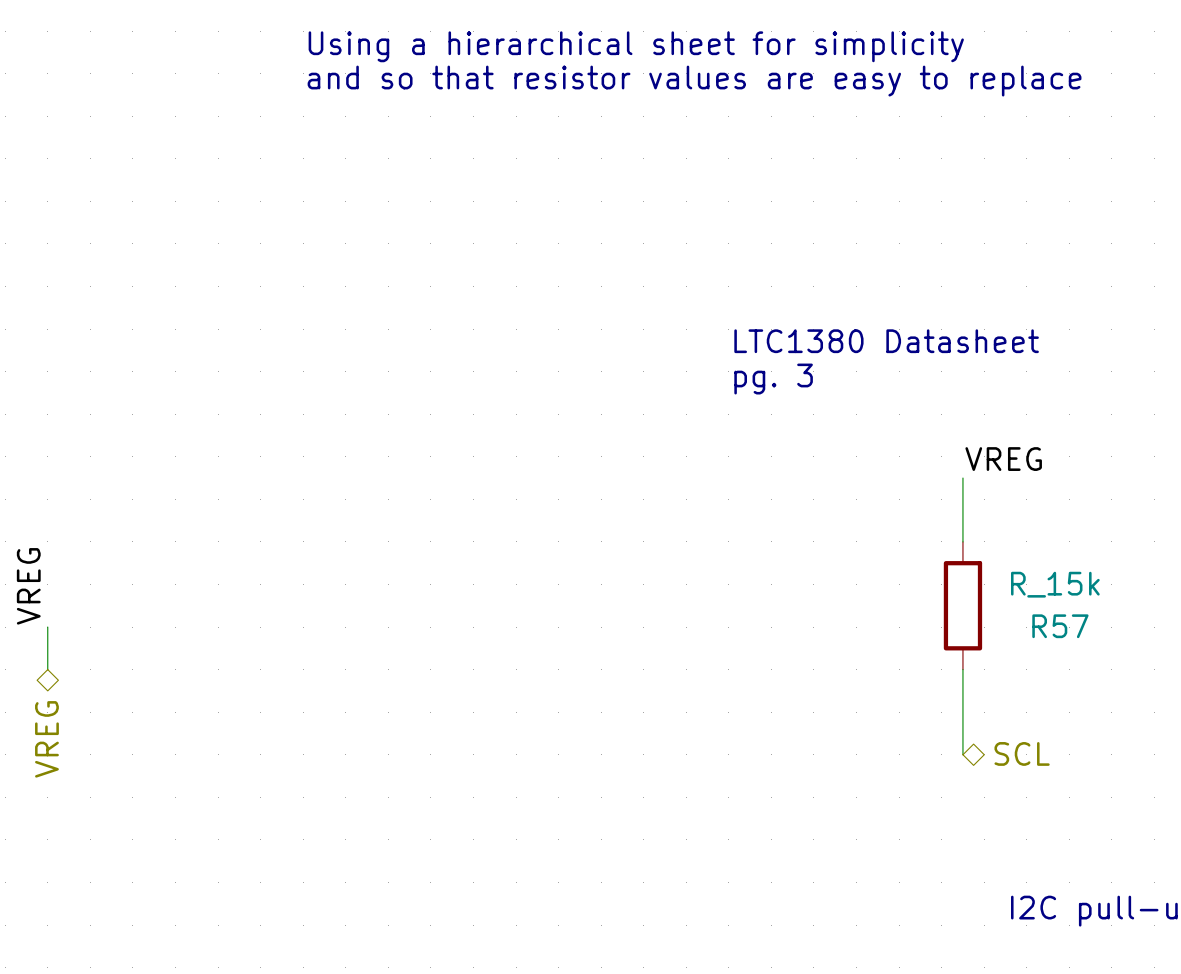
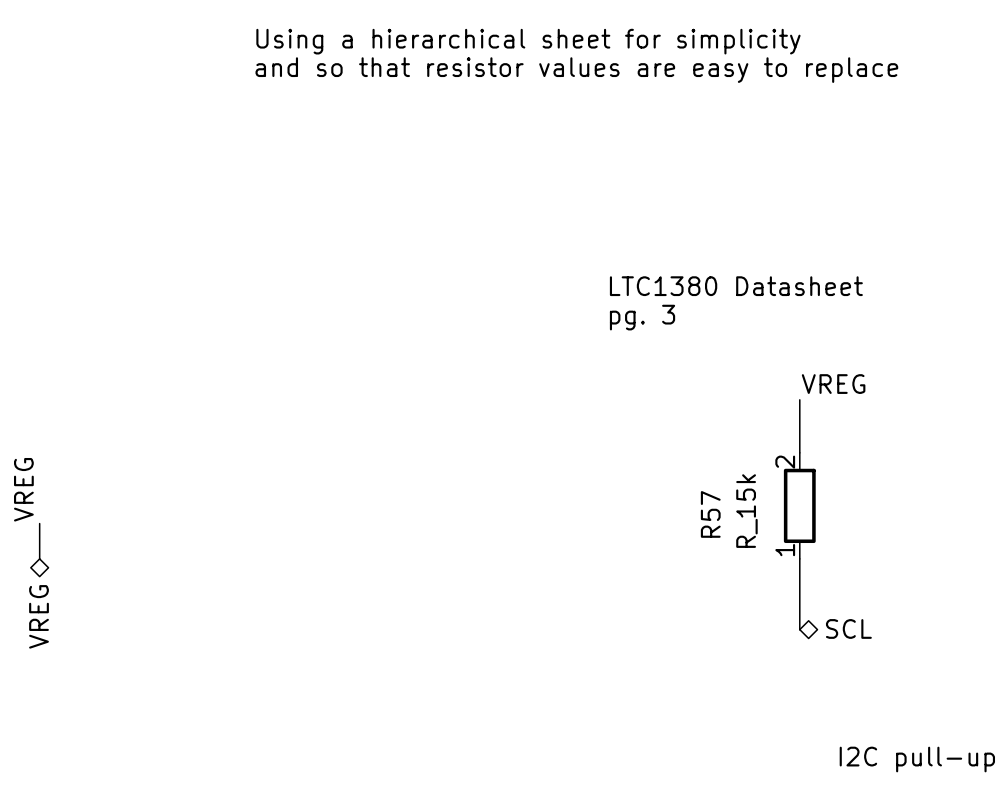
R57 pin number: none -> 2 (785, 462)
R57 value rotation: 0° (1055, 584) -> 90° counterclockwise (746, 511)
R57 value position: R_15k (1055, 584) -> R_15k (746, 511)
R57 name rotation: 0° (1060, 626) -> 90° counterclockwise (710, 514)
R57 name position: R57 (1060, 626) -> R57 (710, 514)
R57 pin number: none -> 1 (785, 550)

